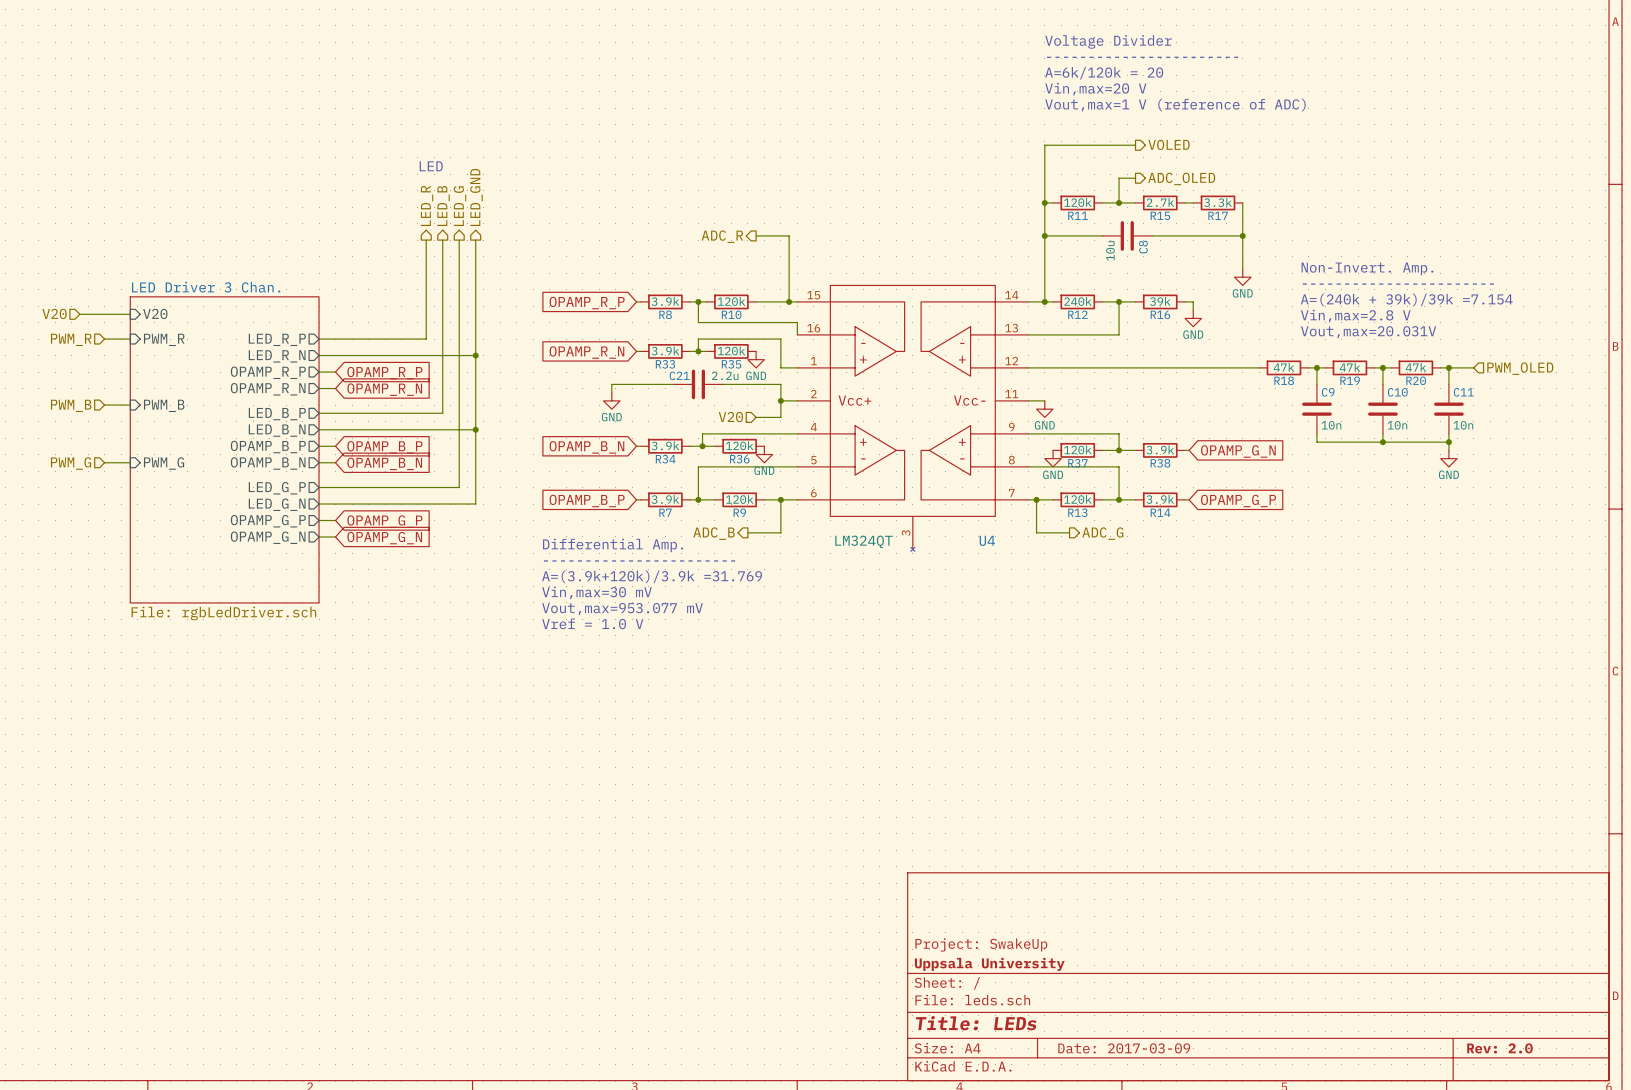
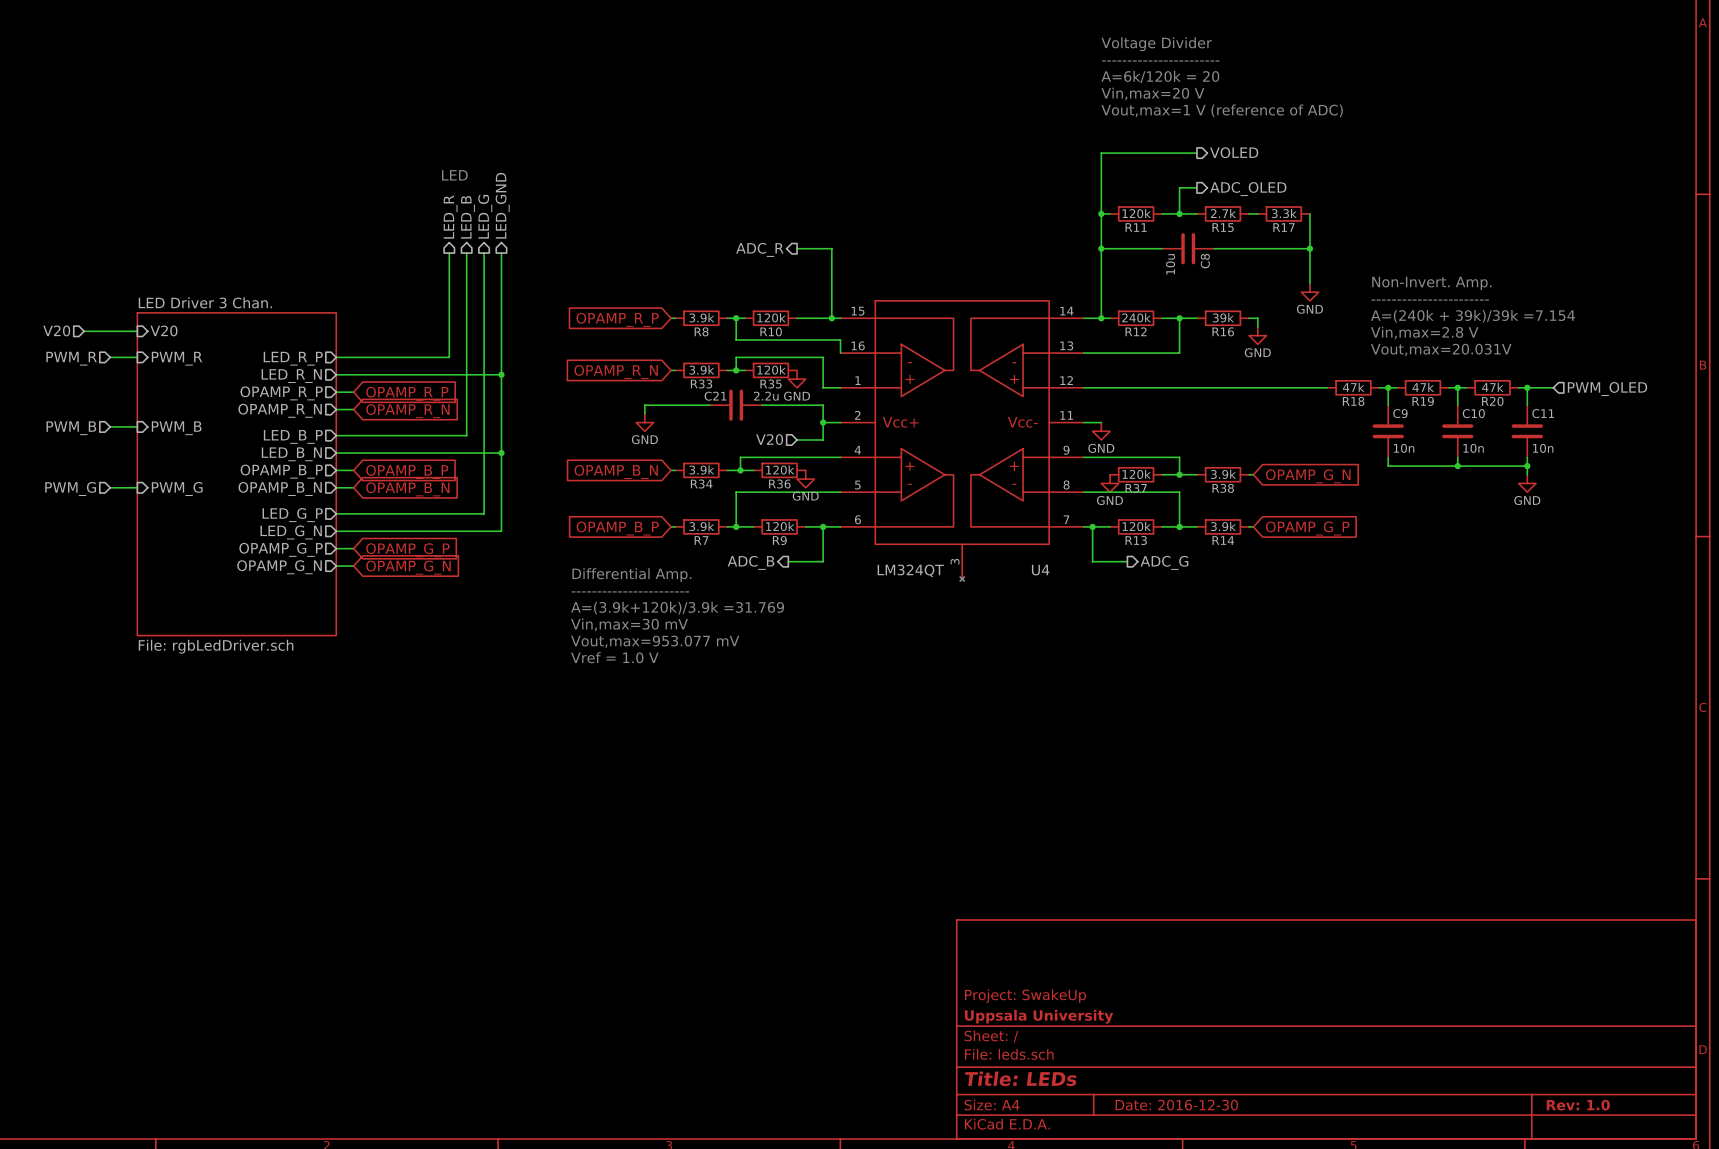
title block: Date: 2017-03-09 (1124, 1048) -> Date: 2016-12-30 (1176, 1105)
title block: Rev: 2.0 (1499, 1048) -> Rev: 1.0 (1578, 1105)

